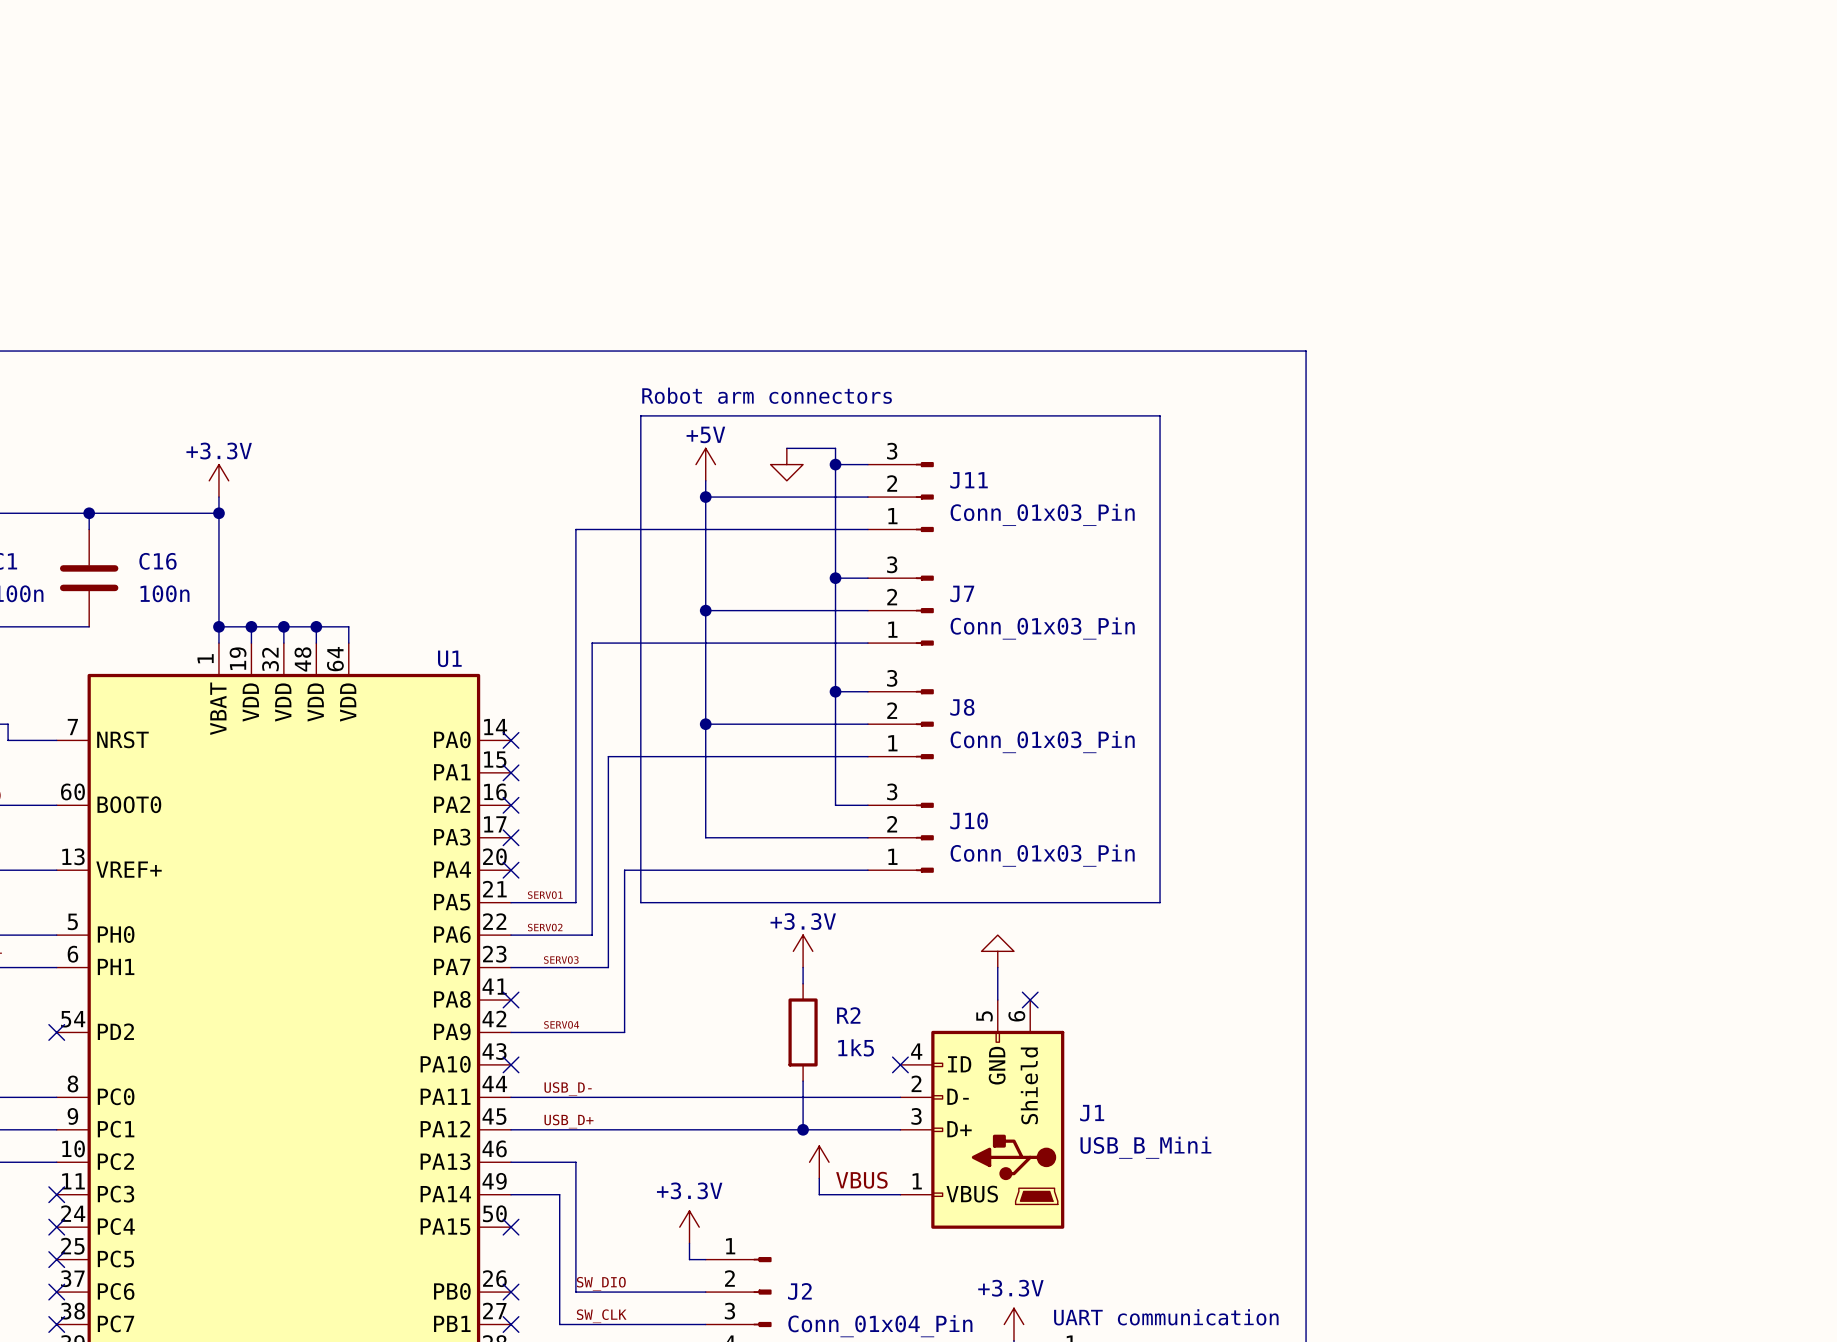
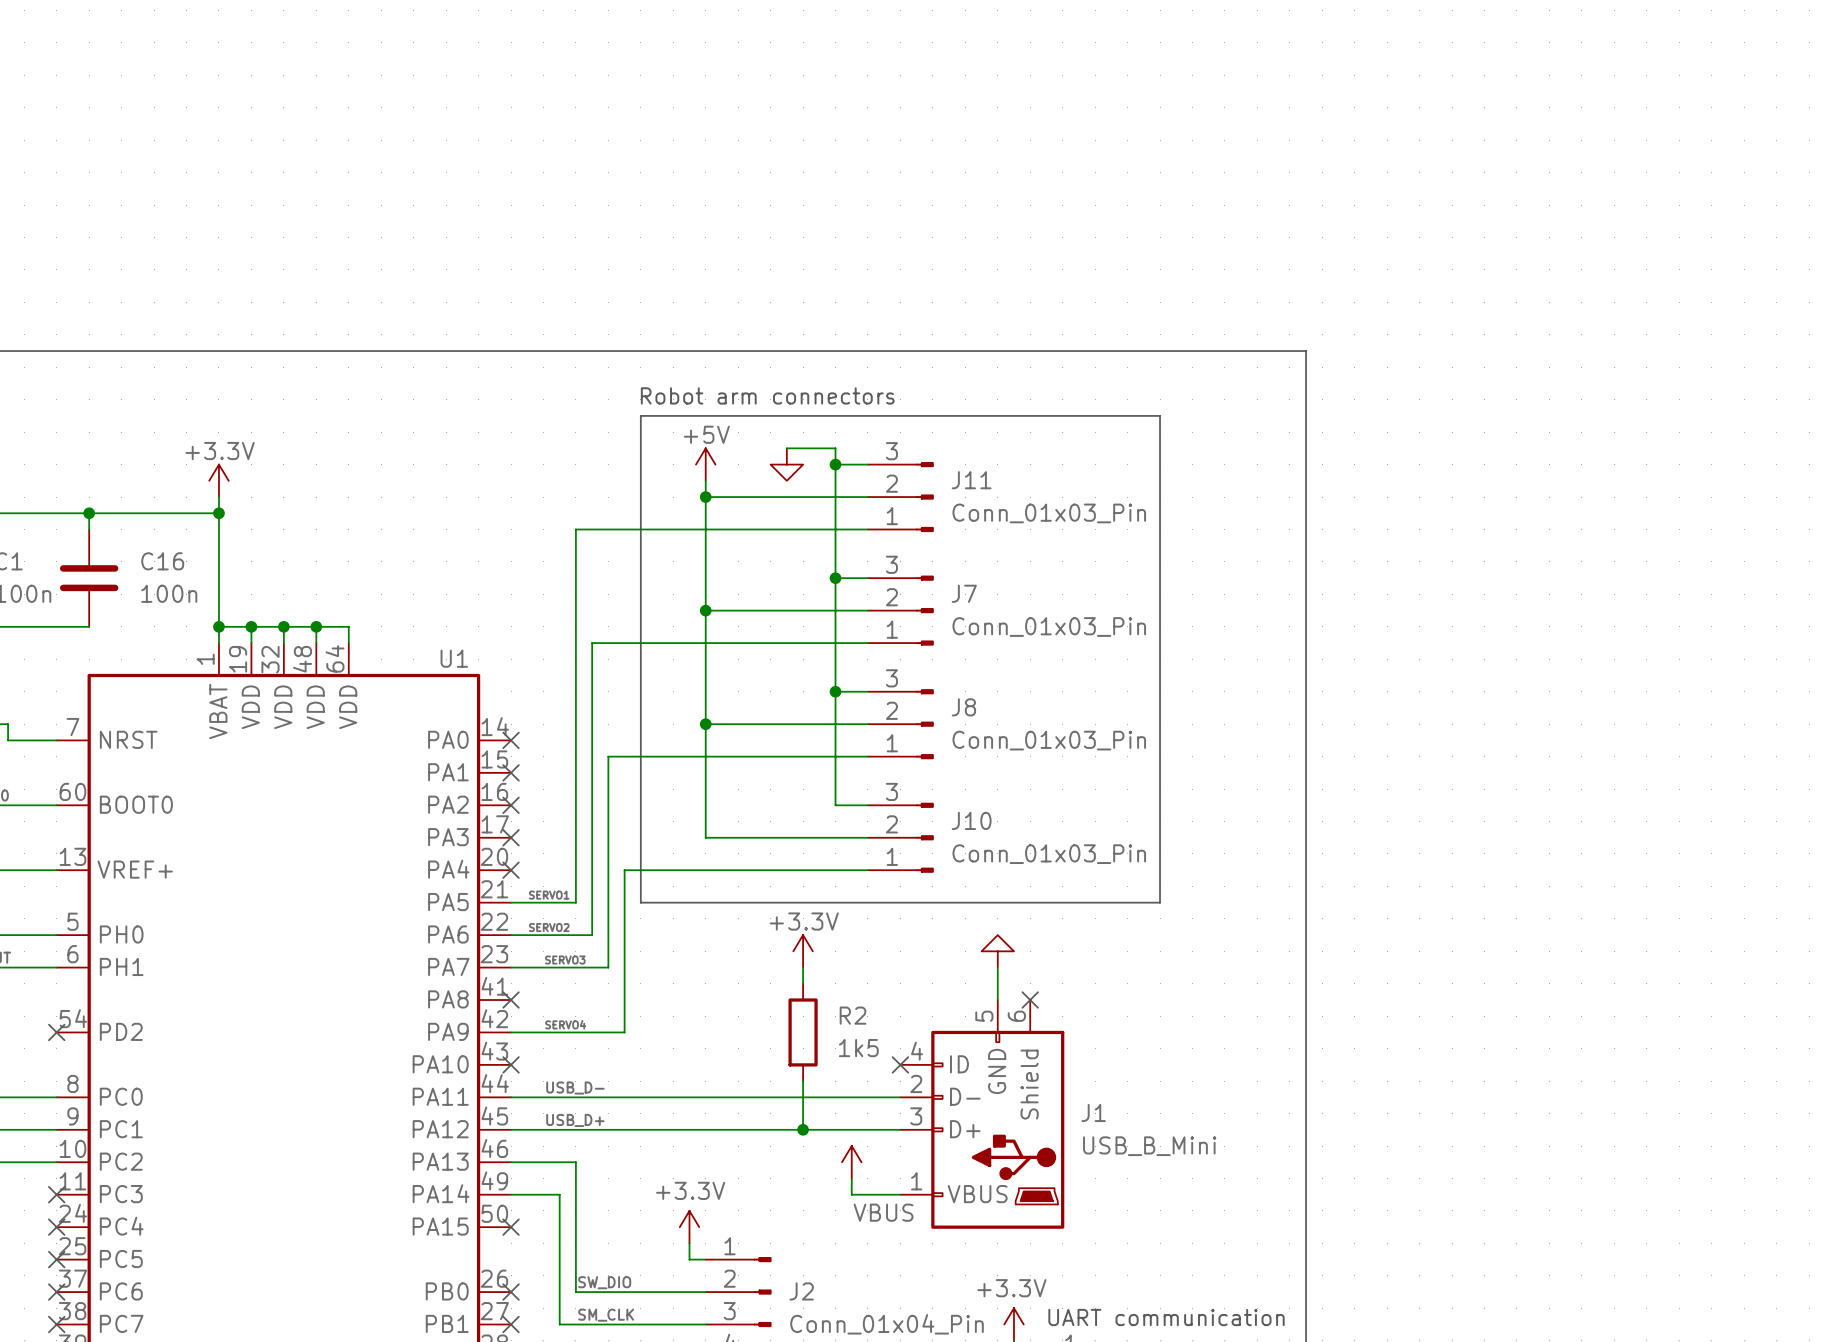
power symbol position: (819, 1162) -> (851, 1162)
wire: (819, 1178) (819, 1194) (851, 1194) -> (851, 1178) (851, 1194)
label position: VBUS (861, 1180) -> VBUS (883, 1212)
label: SW_CLK (601, 1316) -> SM_CLK (606, 1315)

